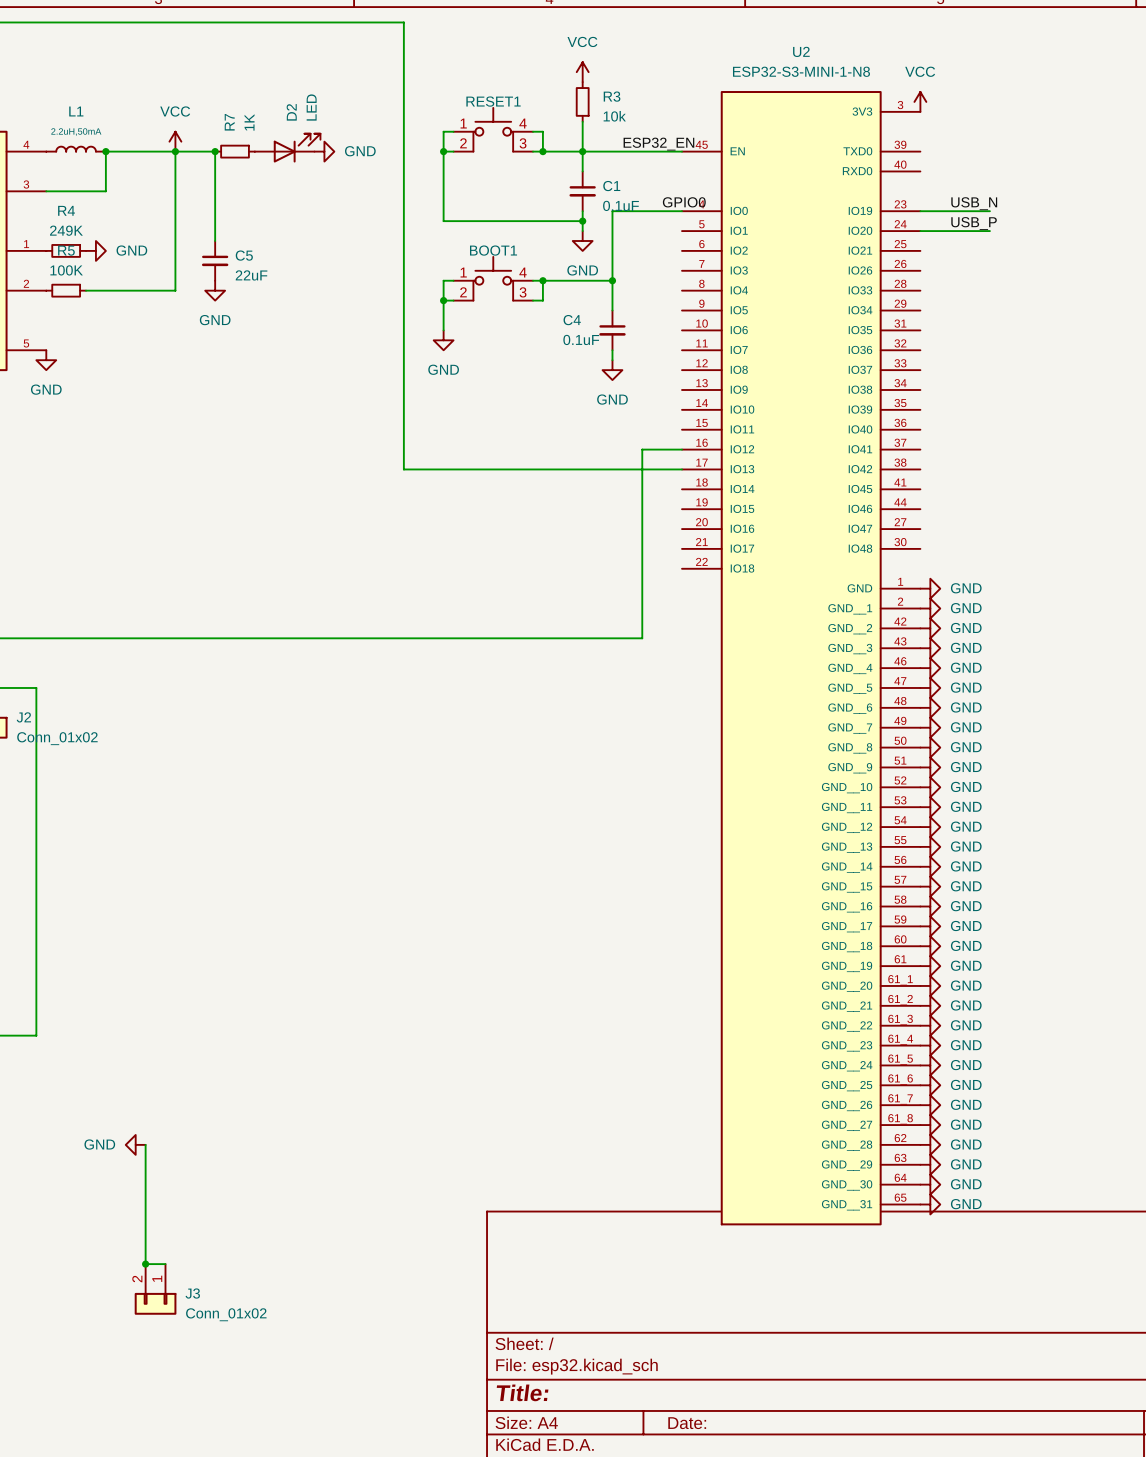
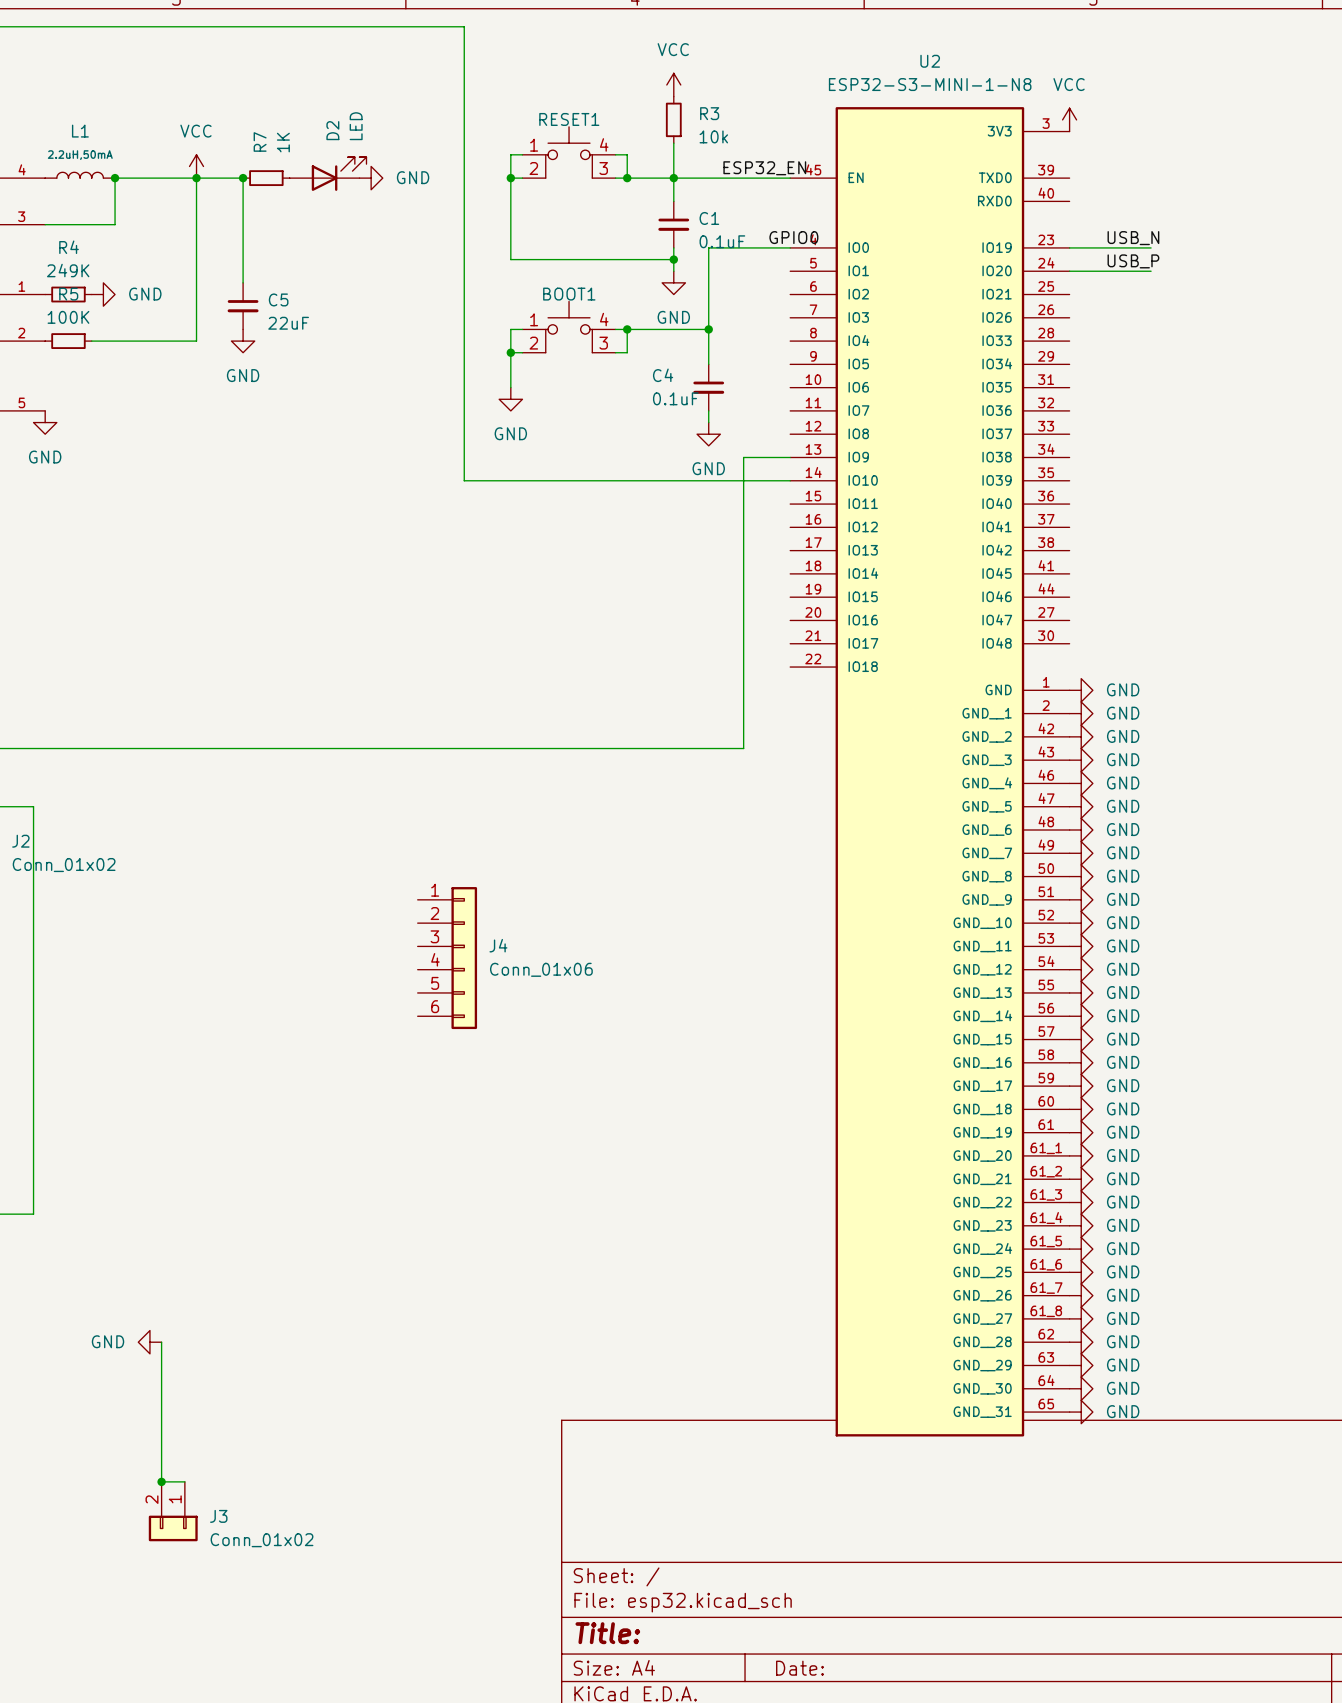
wire: (403, 409) (403, 469) (682, 469) -> (464, 480) (790, 480)
wire: (642, 449) (682, 449) -> (743, 527) (743, 457) (790, 457)
J4: none -> Conn_01x06 (447, 958)

